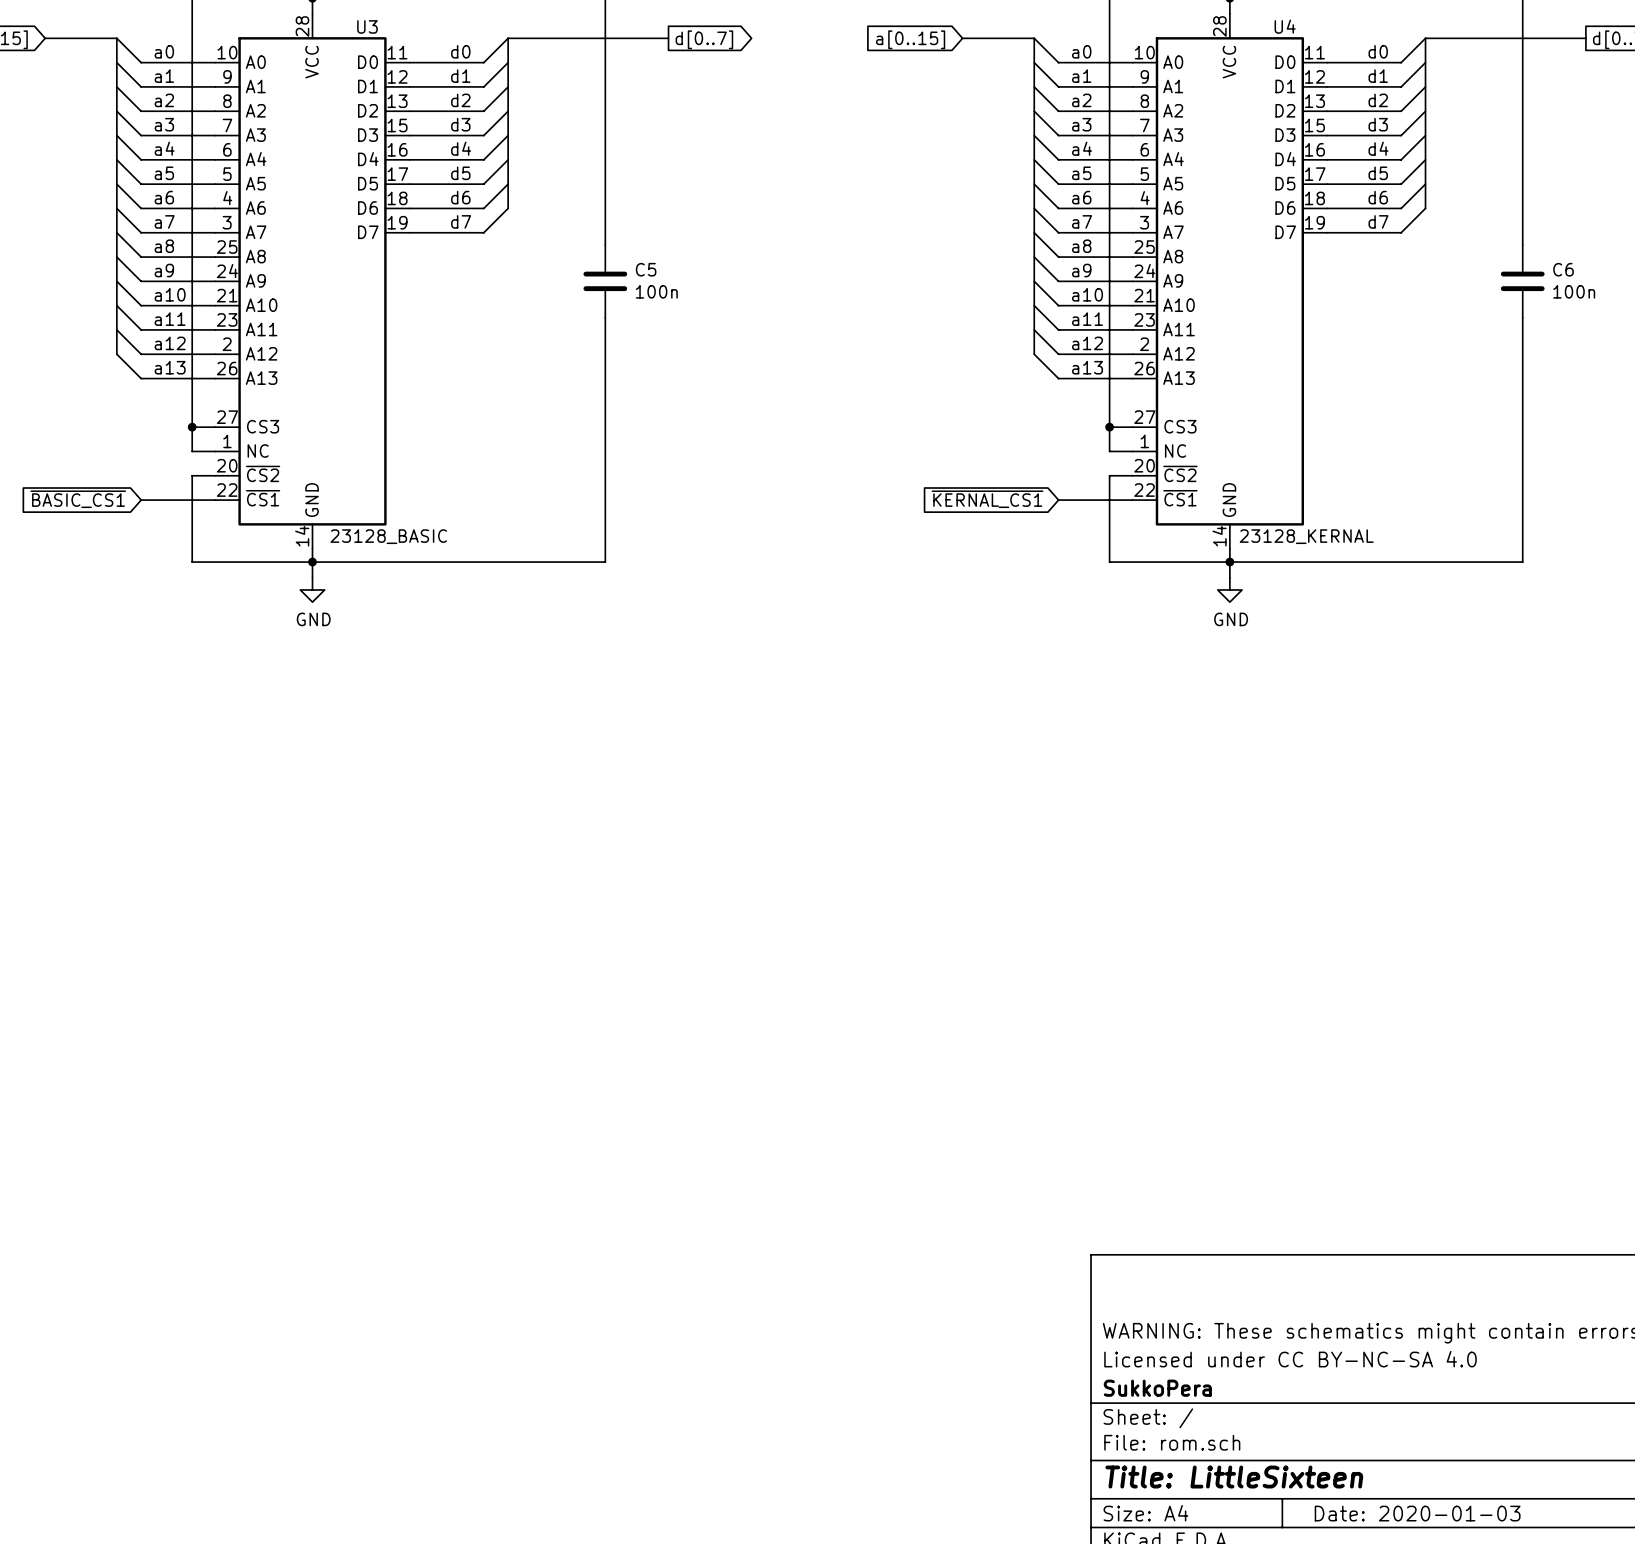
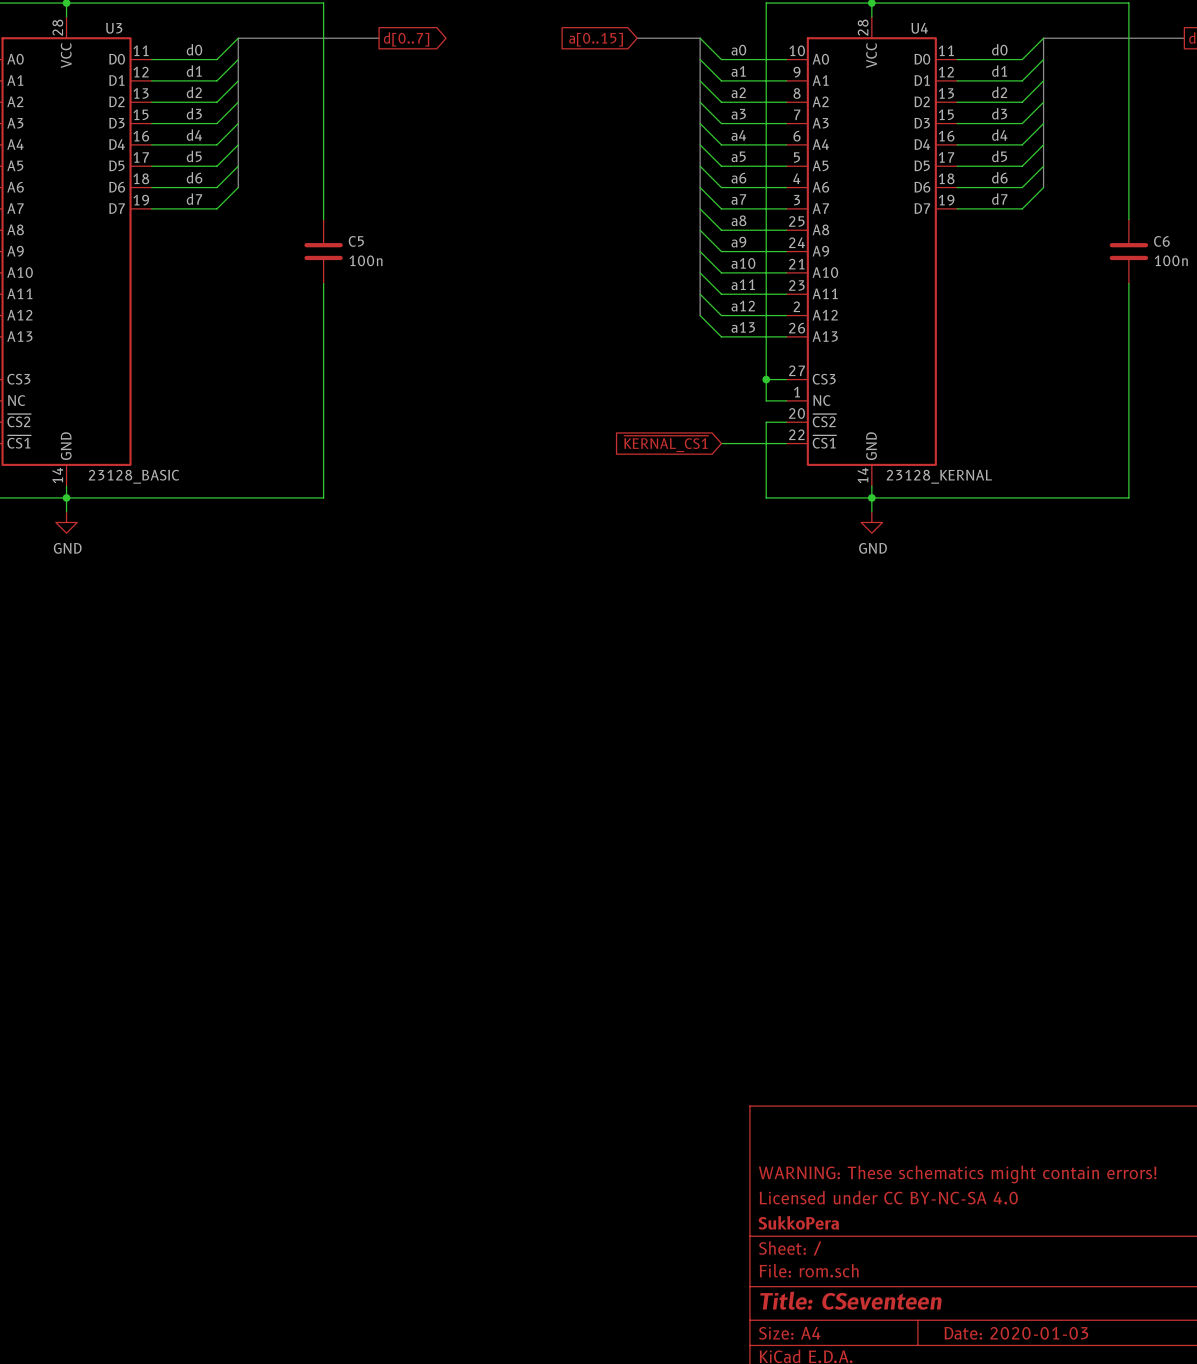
title block: Title: LittleSixteen (1234, 1477) -> Title: CSeventeen (850, 1300)

